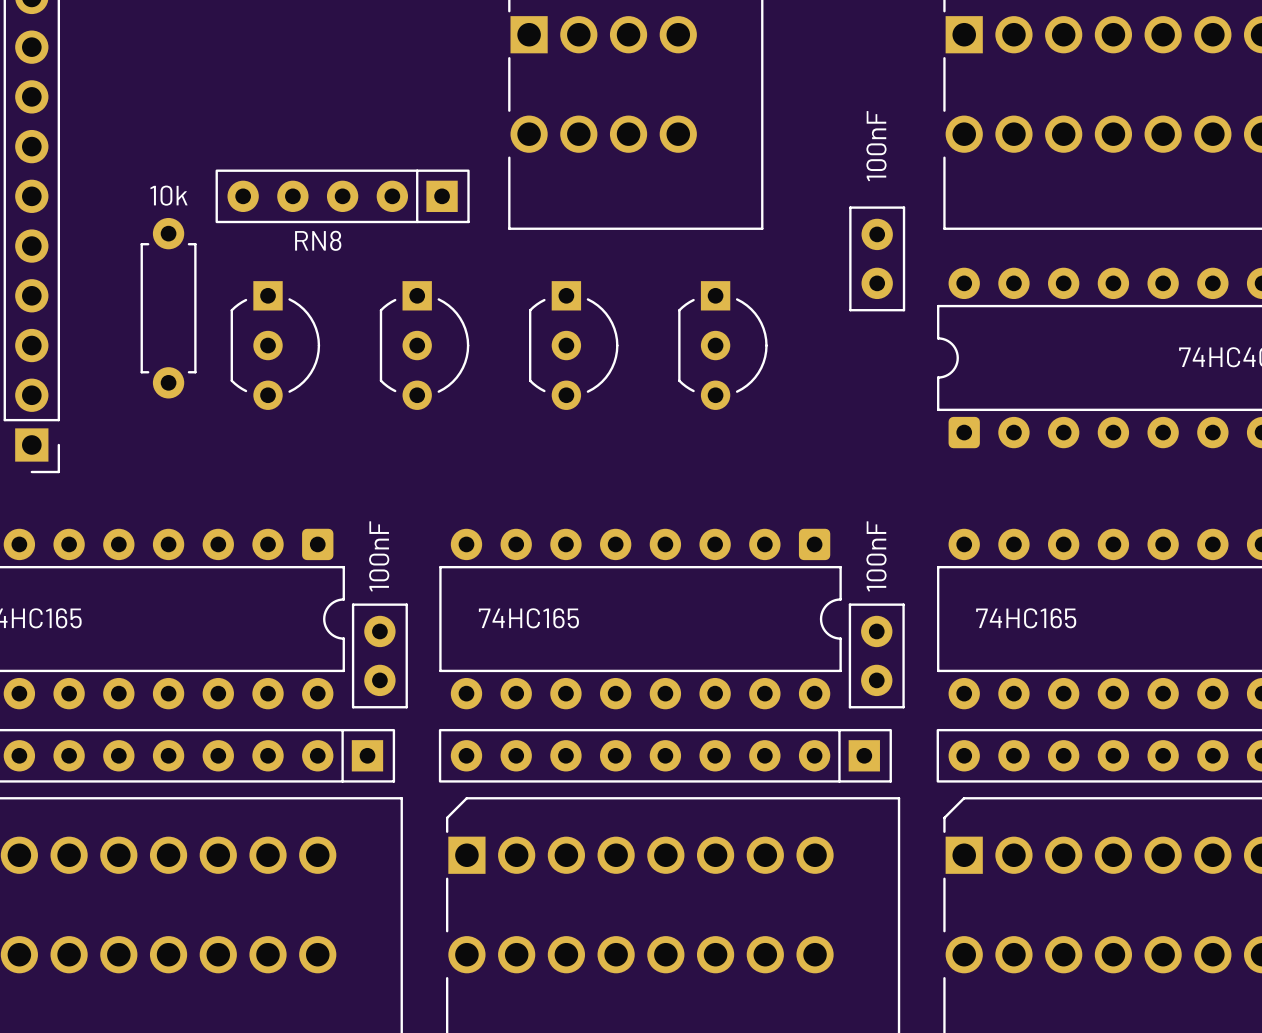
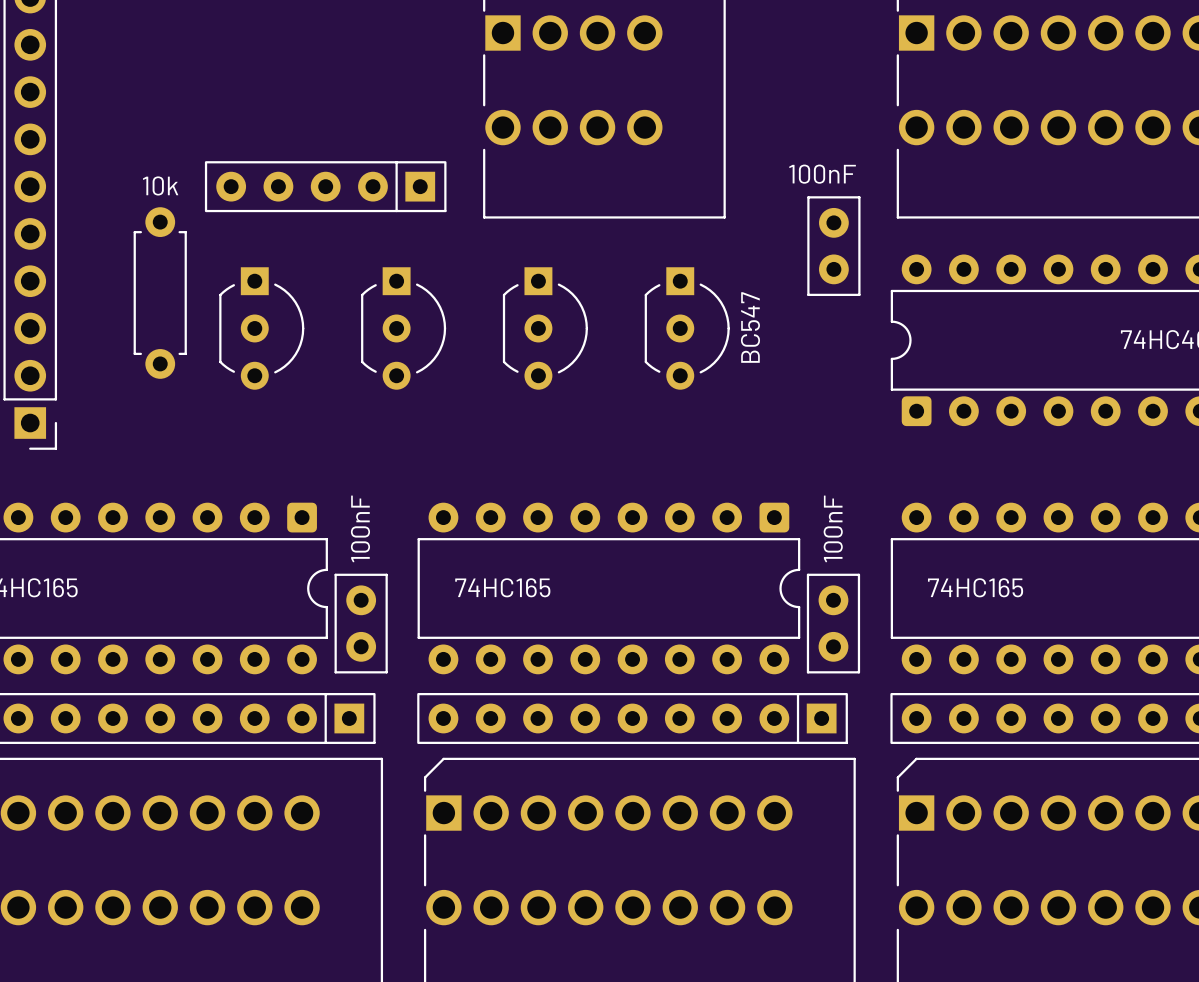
part value rotation: 0° (876, 146) -> 90° clockwise (822, 174)
RN8 name: RN8 (318, 240) -> none
text: none -> BC547 (750, 327)

